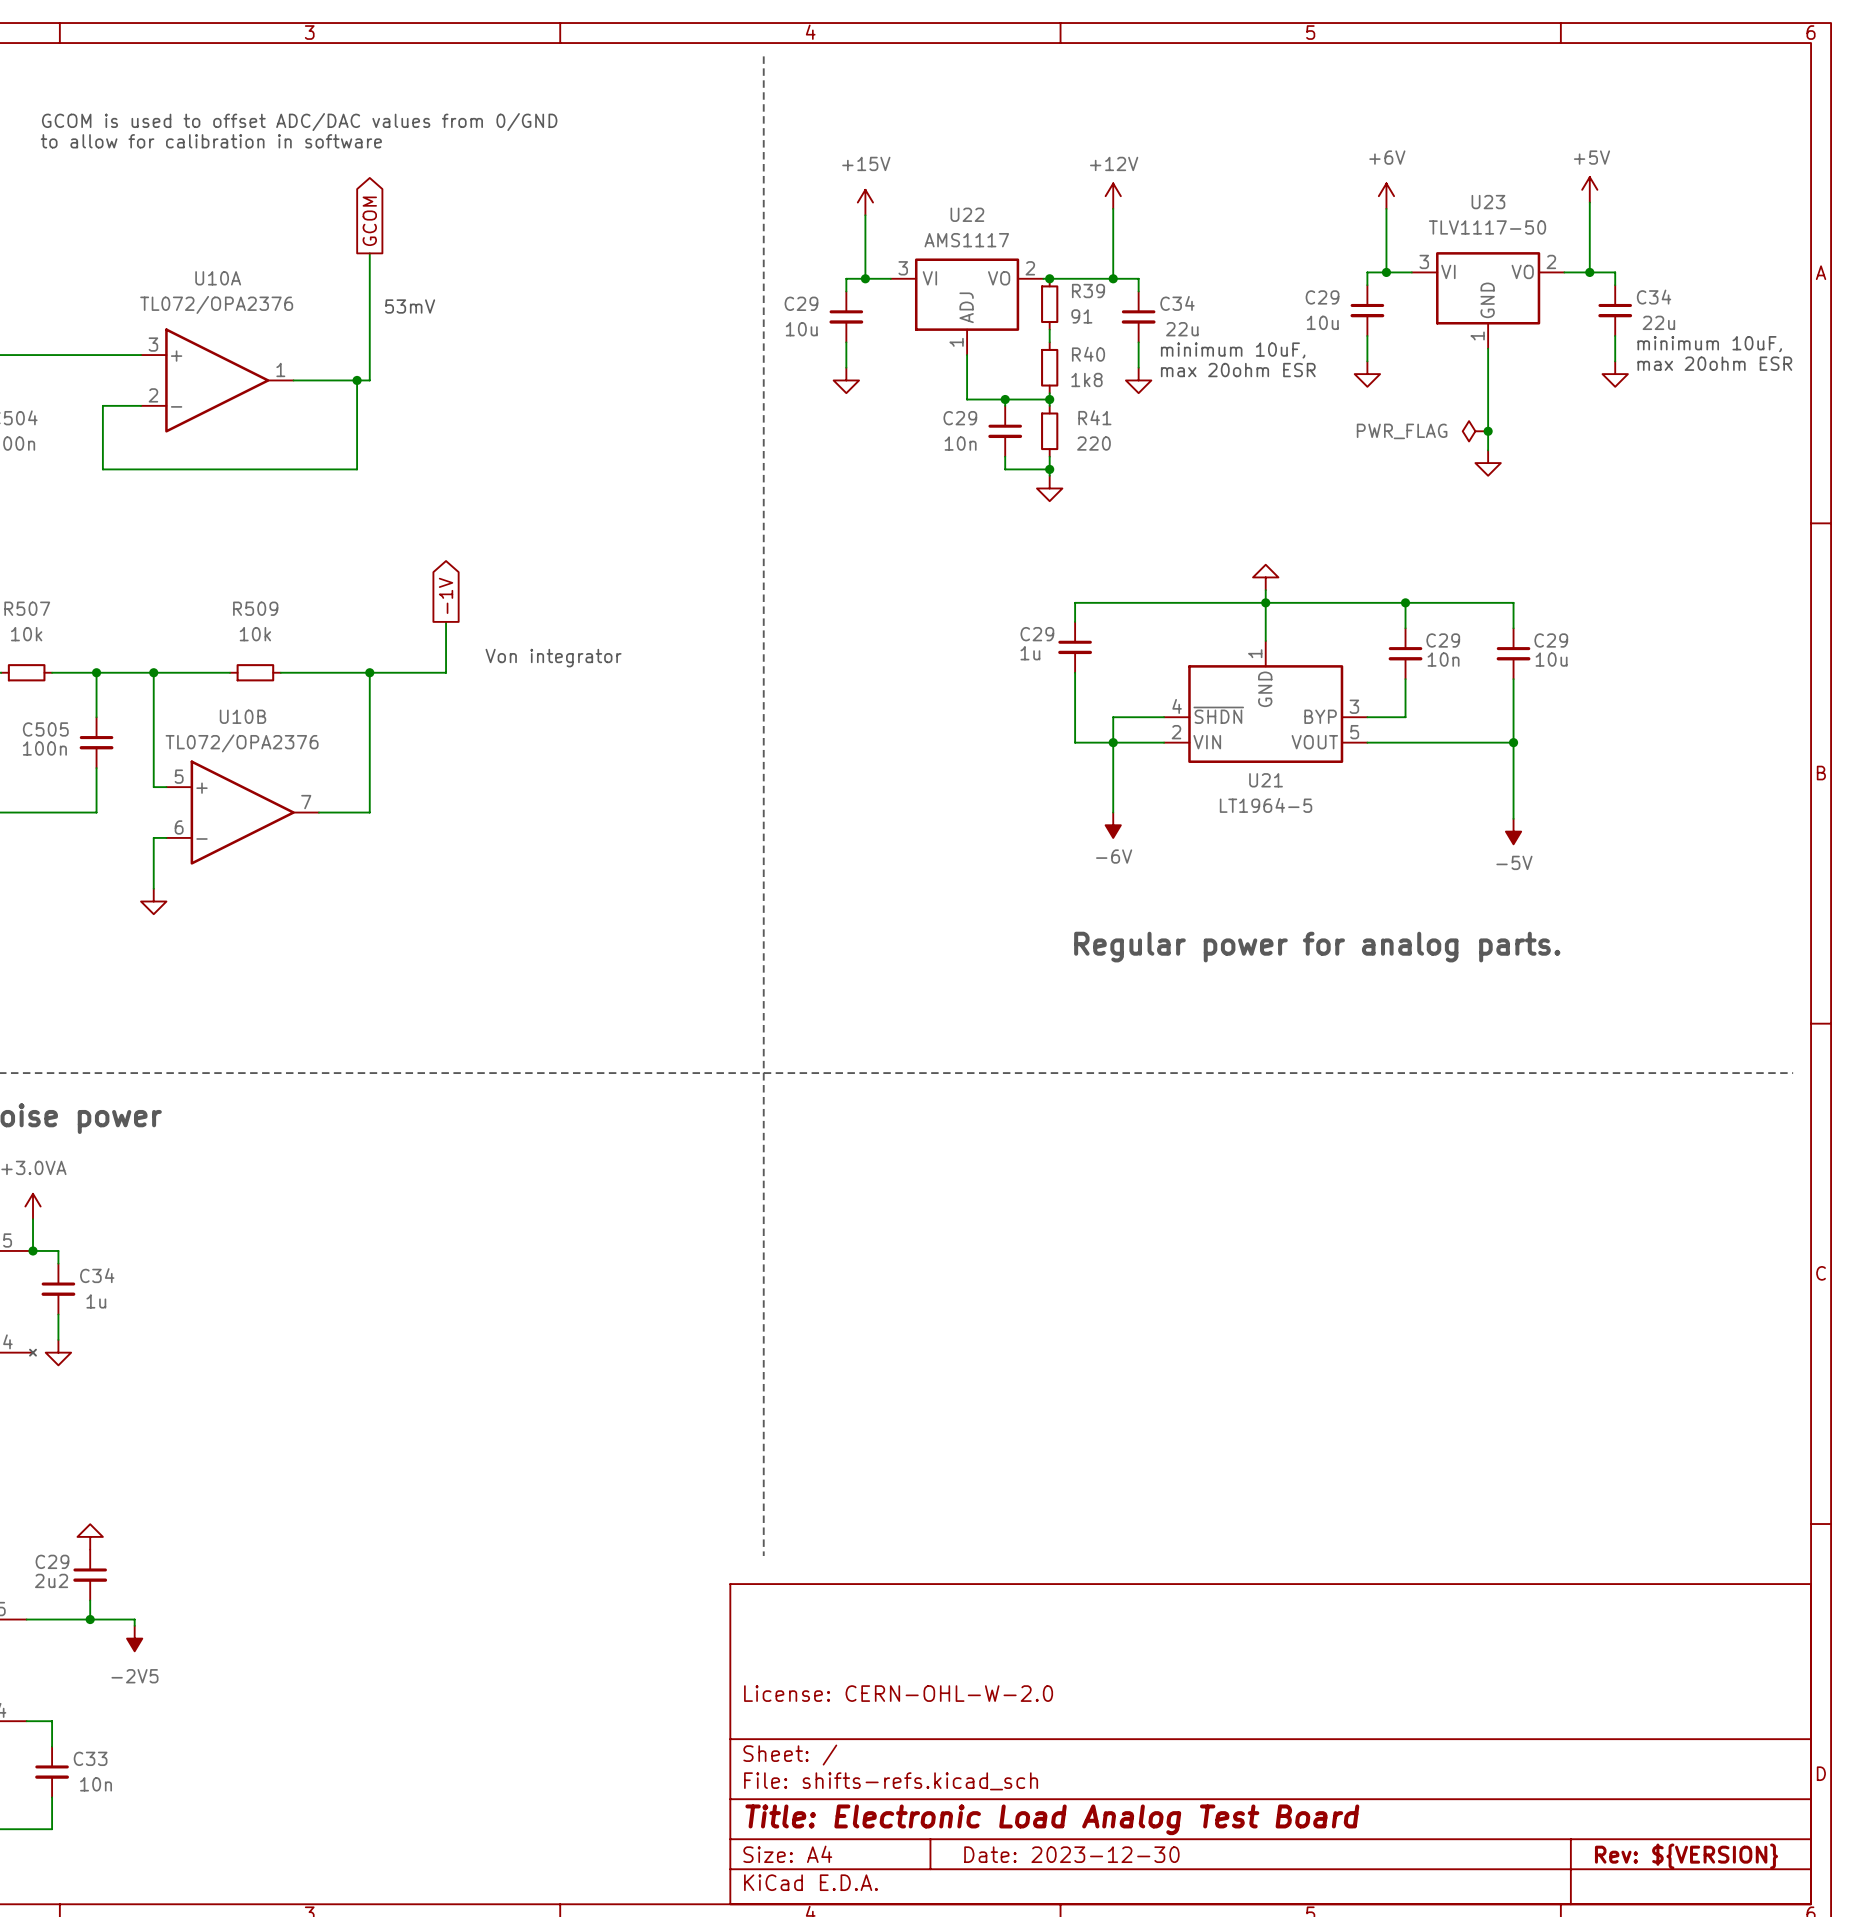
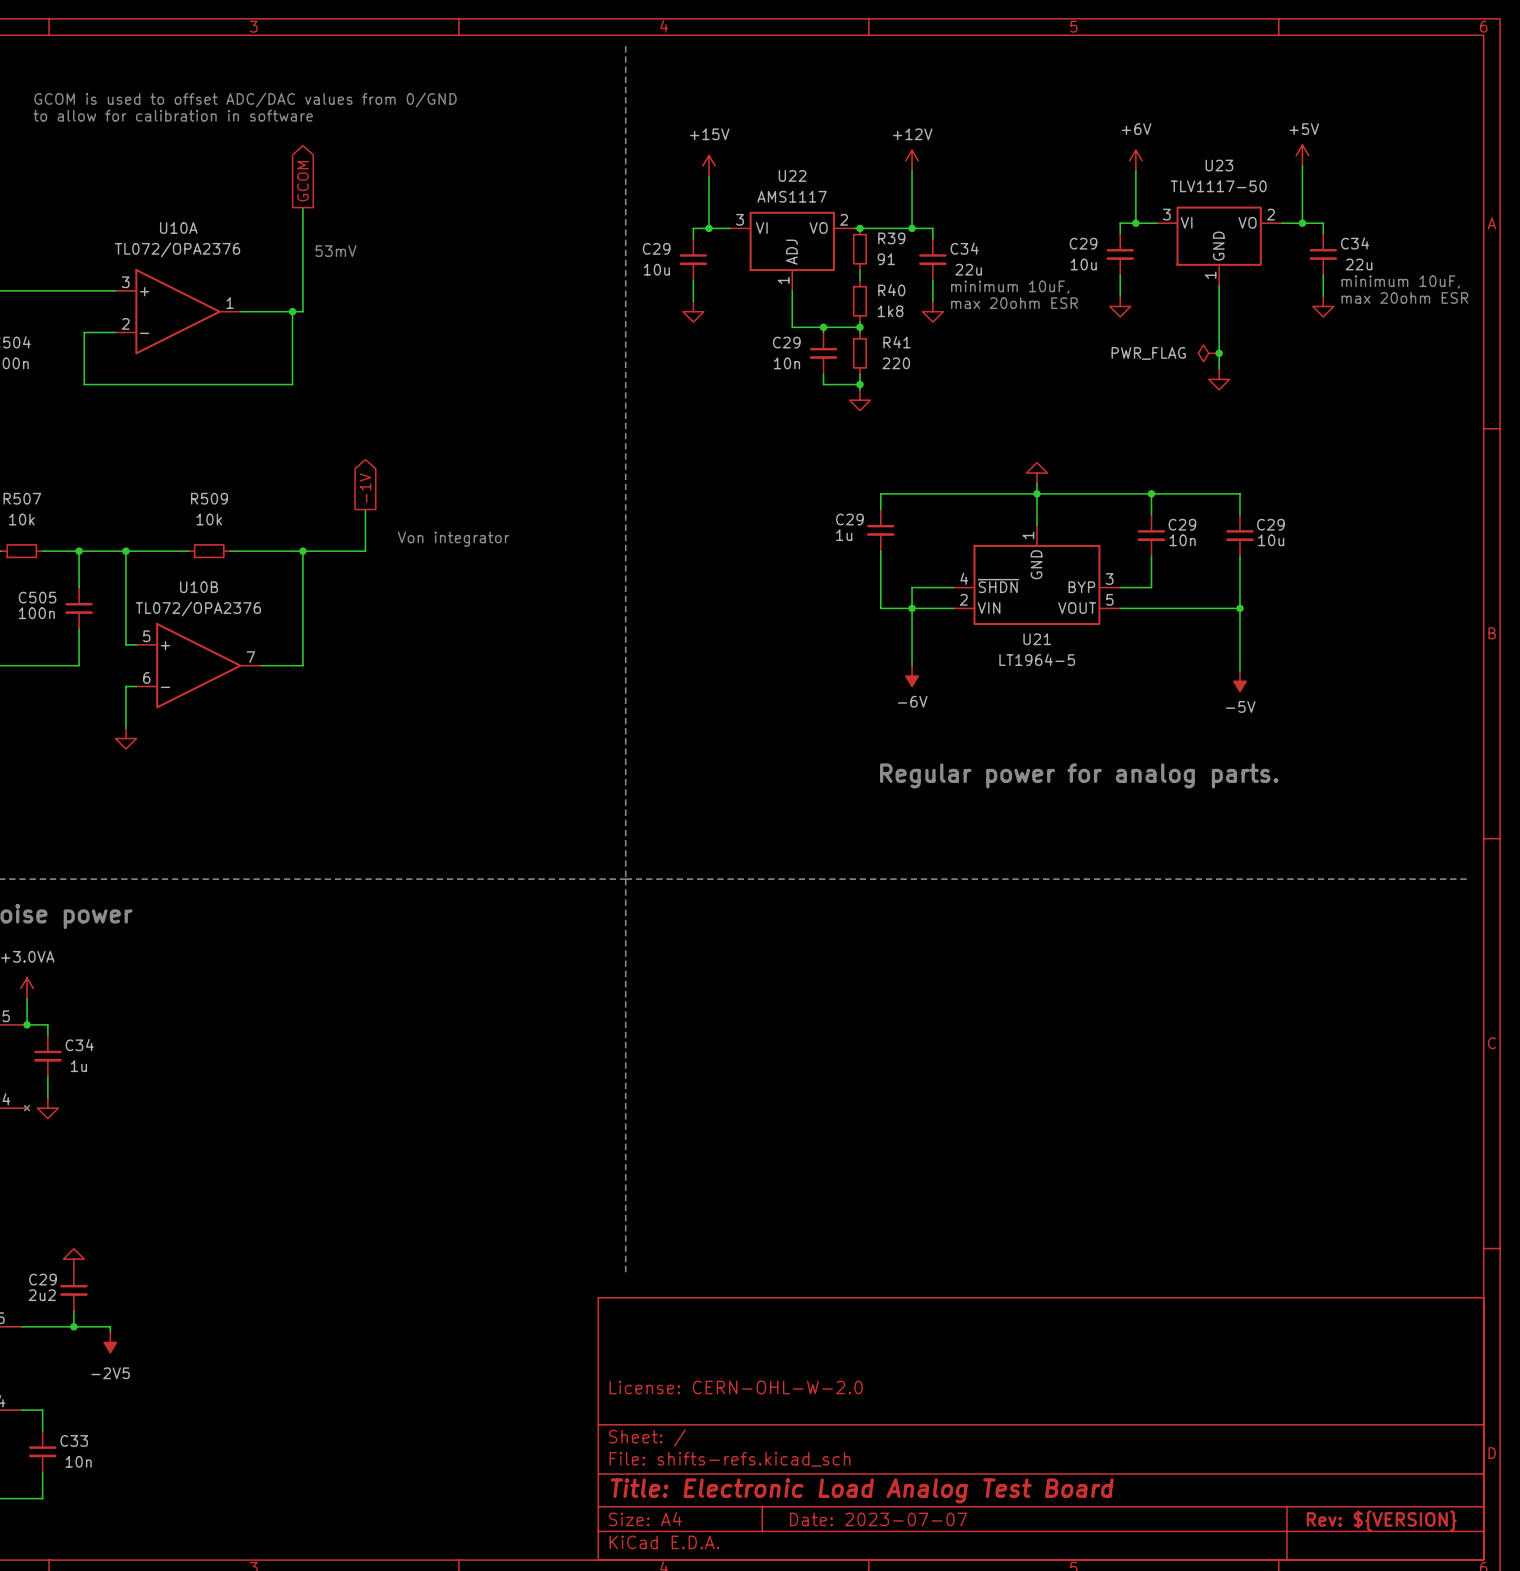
title block: Date: 2023-12-30 (1071, 1854) -> Date: 2023-07-07 (878, 1519)

